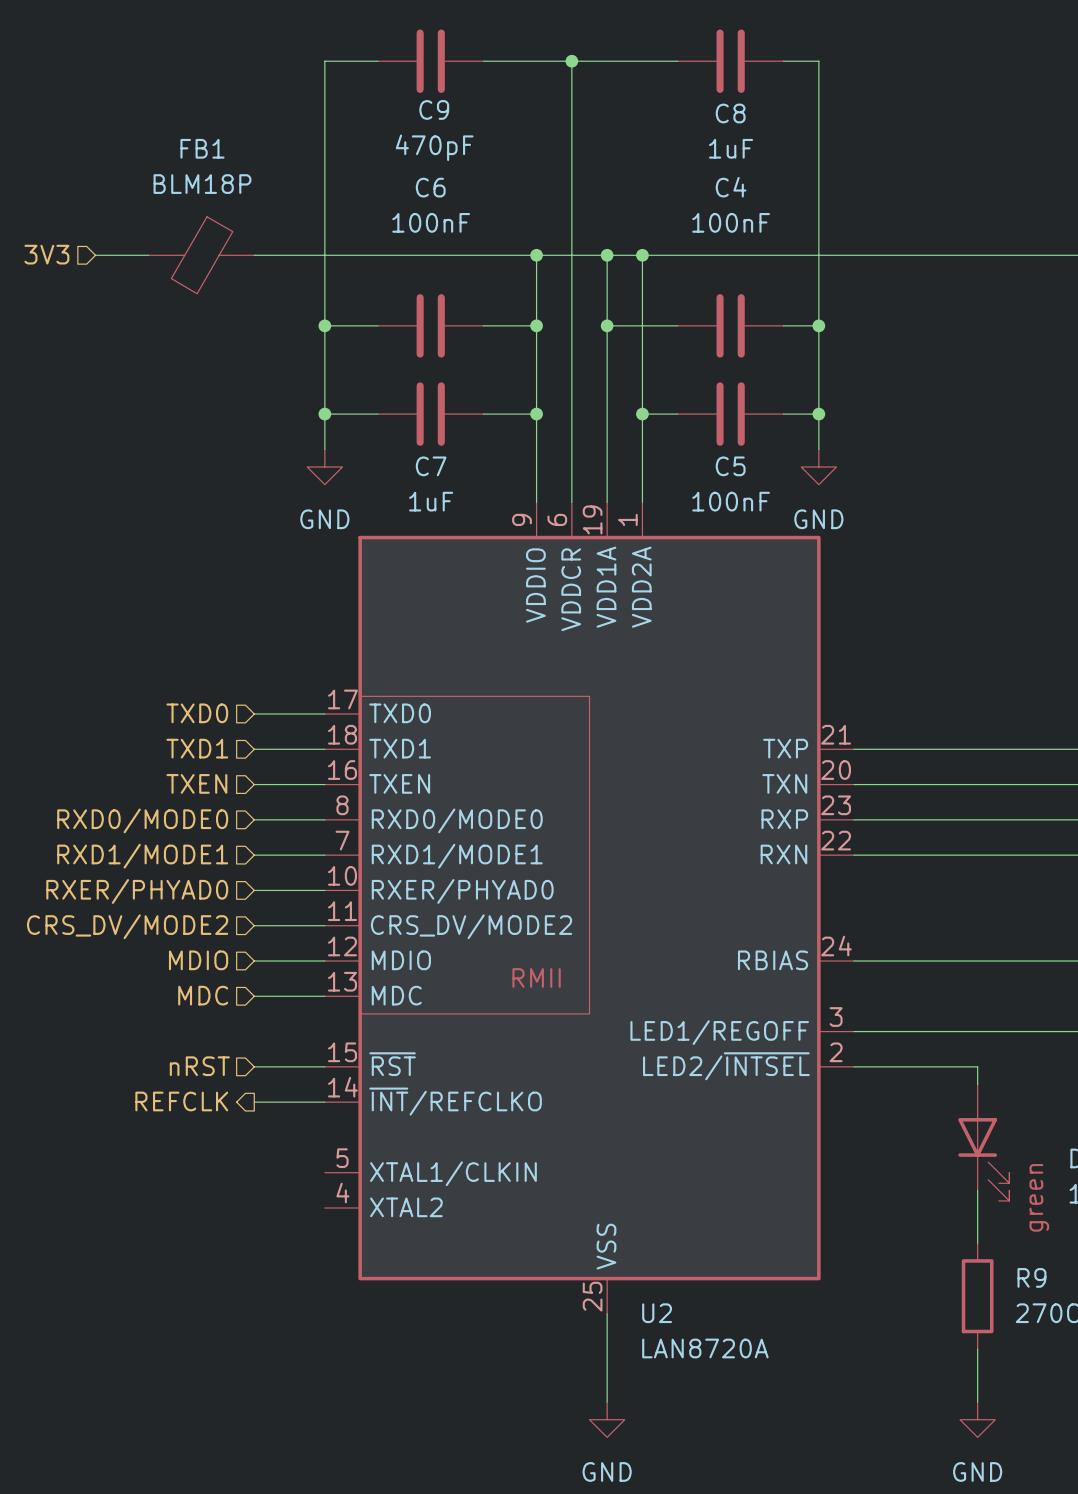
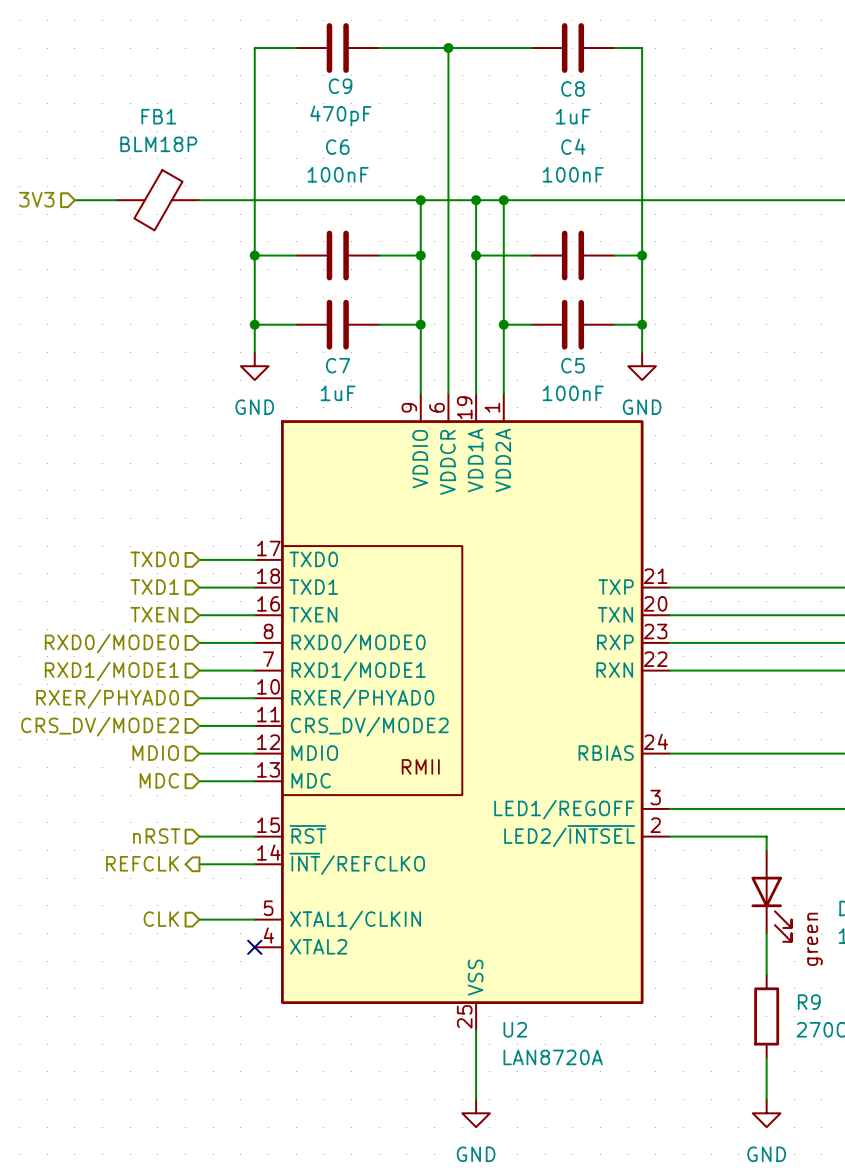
hierarchical label: none -> CLK (161, 919)
wire: none -> (199, 919) (254, 919)
no-connect mark: none -> (254, 947)

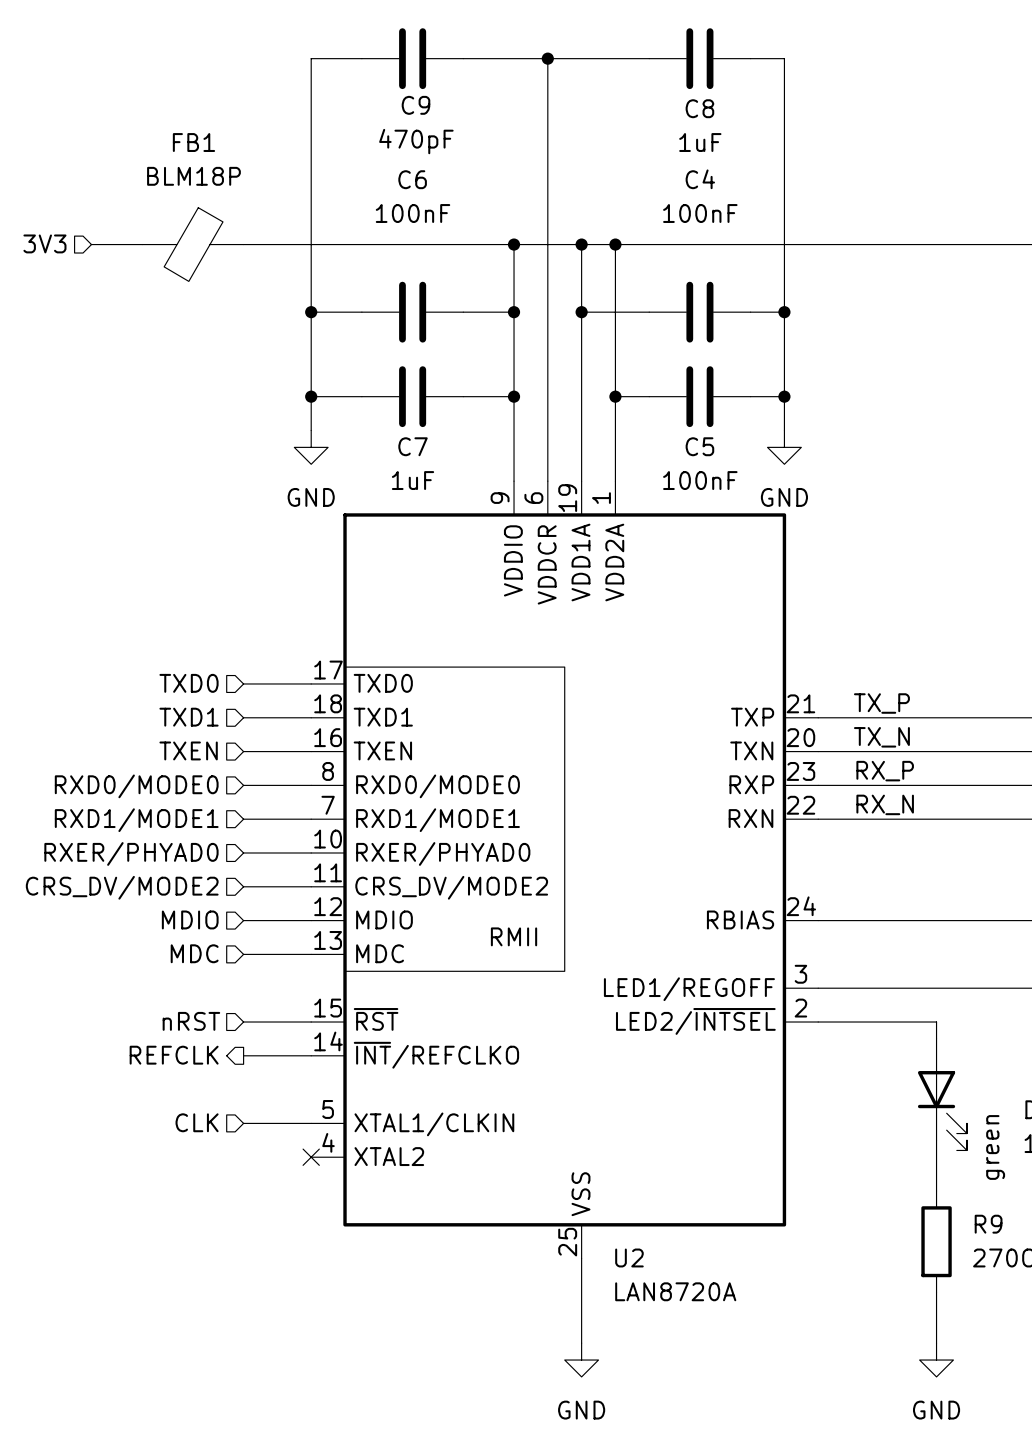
label: none -> TX_P (881, 703)
label: none -> TX_N (881, 737)
label: none -> RX_P (885, 771)
label: none -> RX_N (885, 804)

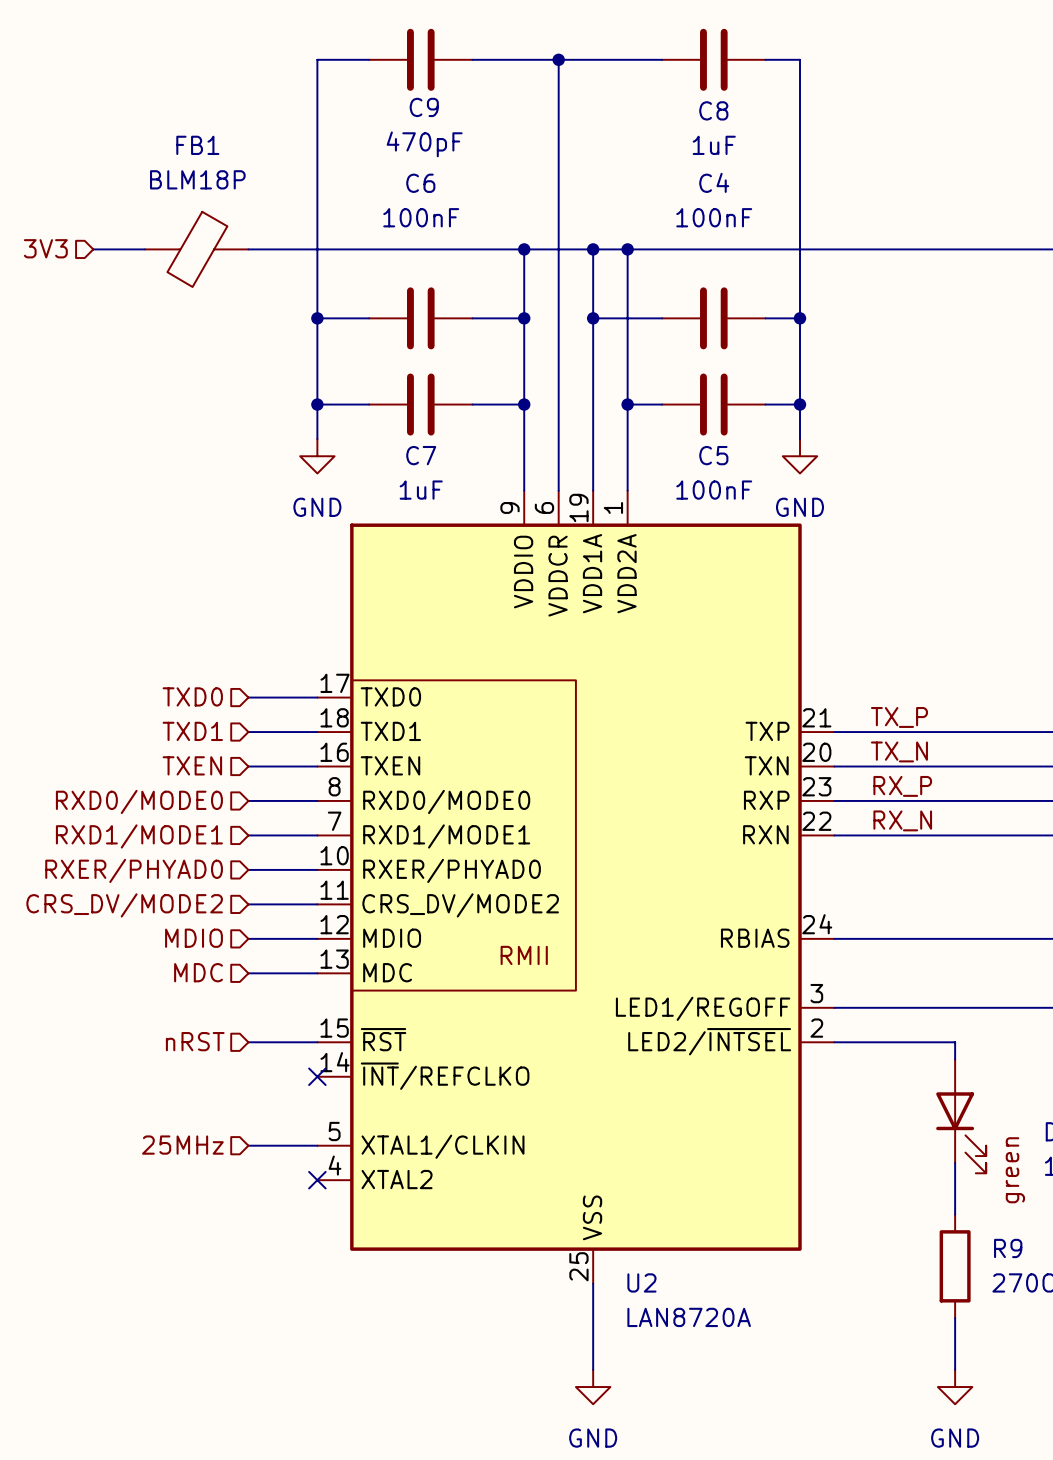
hierarchical label: REFCLK (174, 1055) -> none
wire: (243, 1055) (311, 1055) -> none
no-connect mark: none -> (317, 1076)
hierarchical label: CLK (197, 1122) -> 25MHz (182, 1145)

